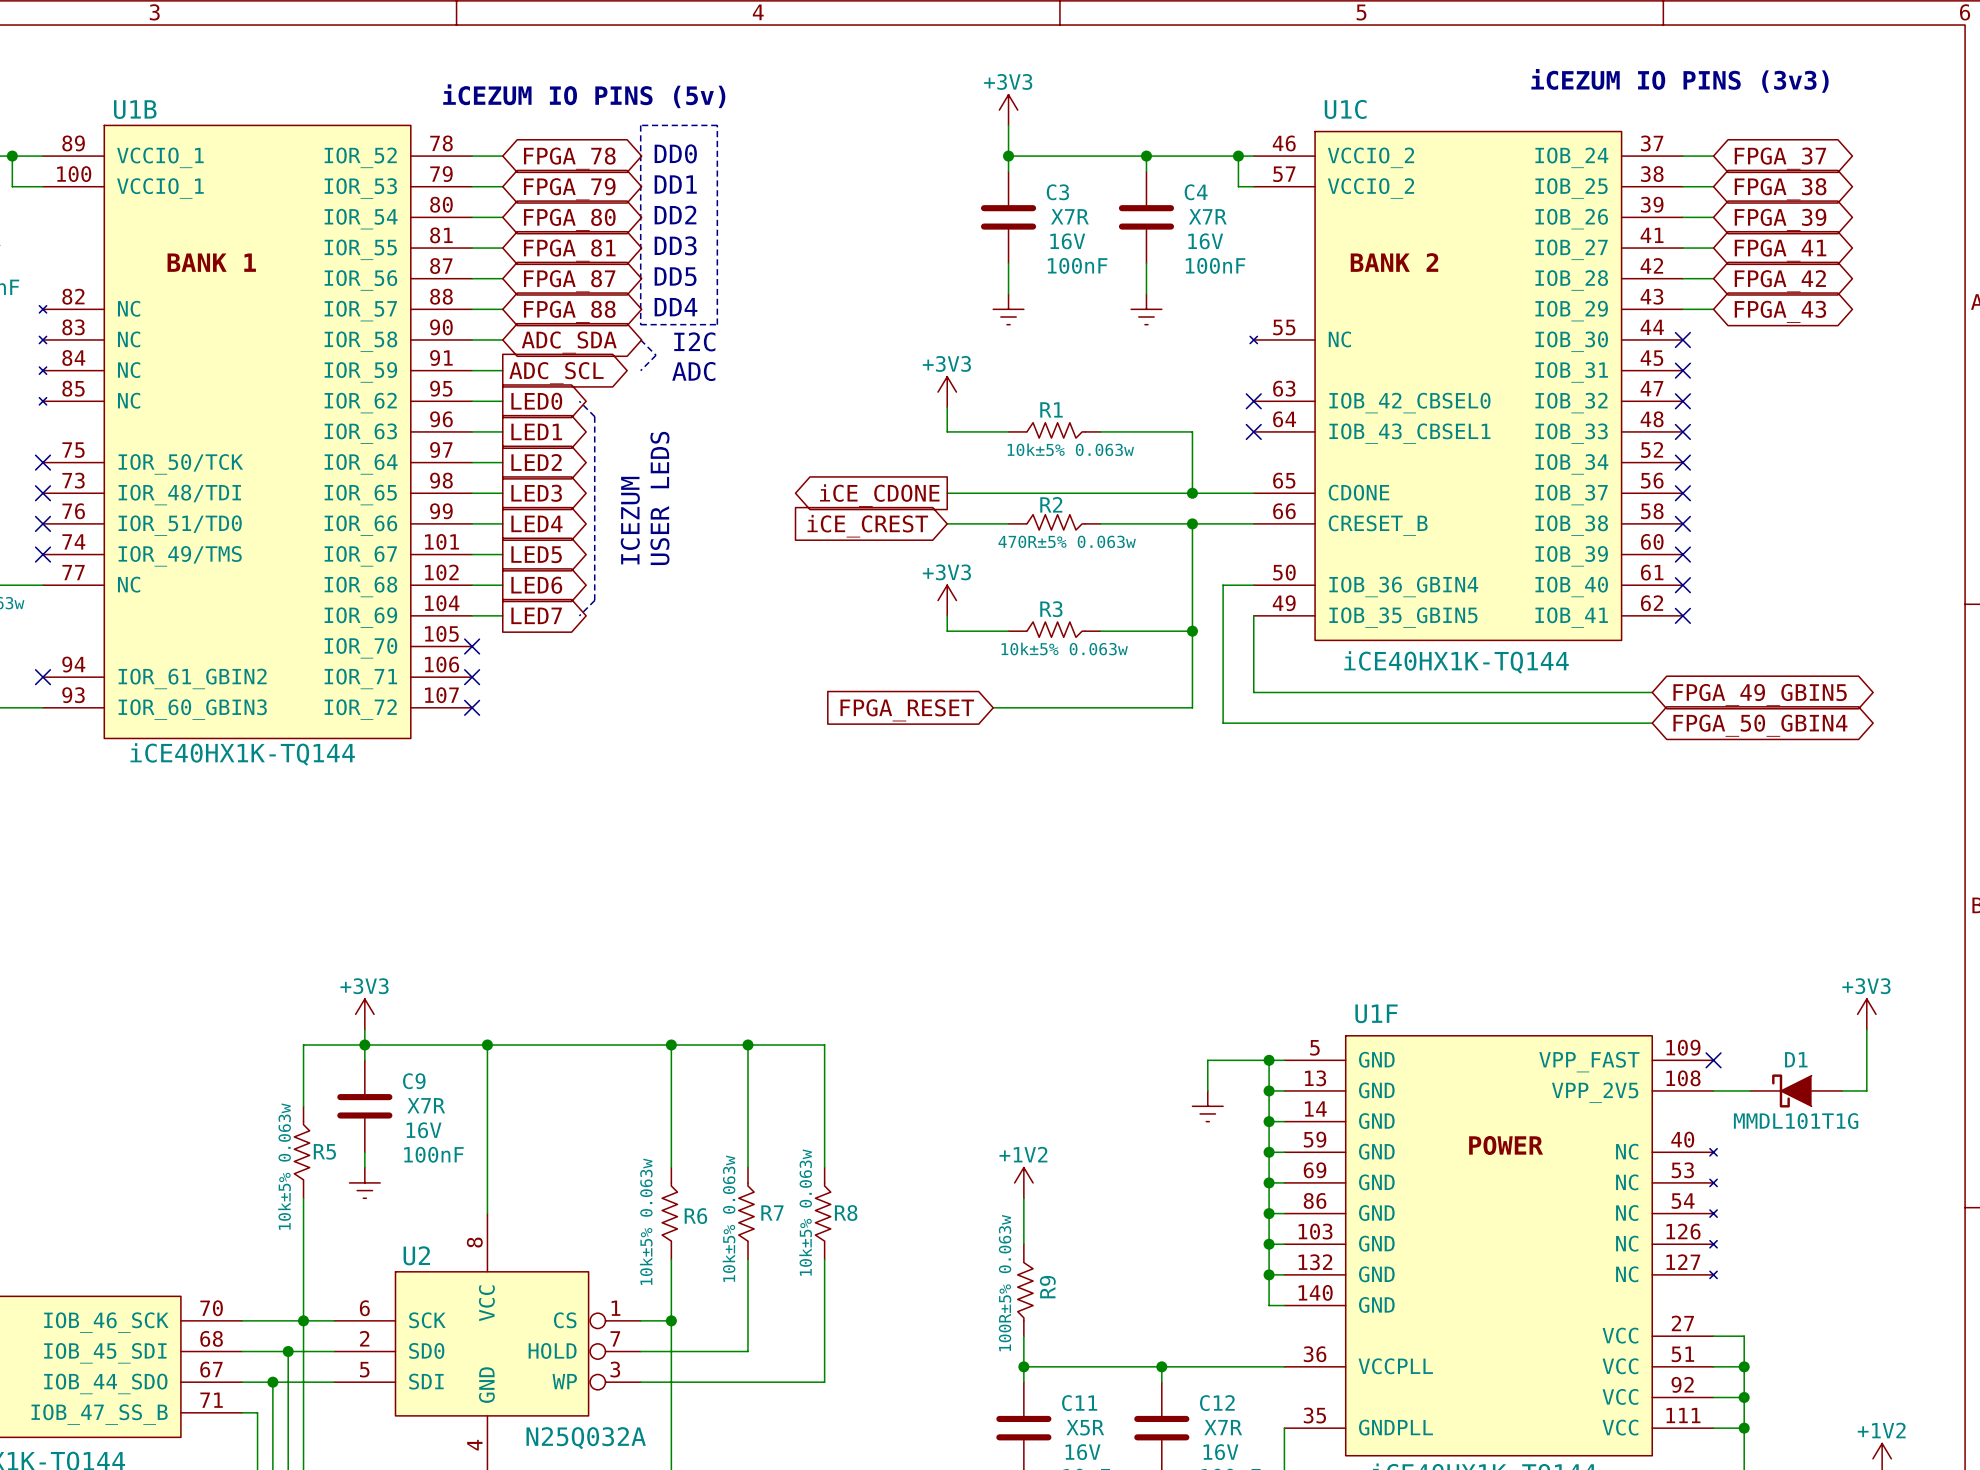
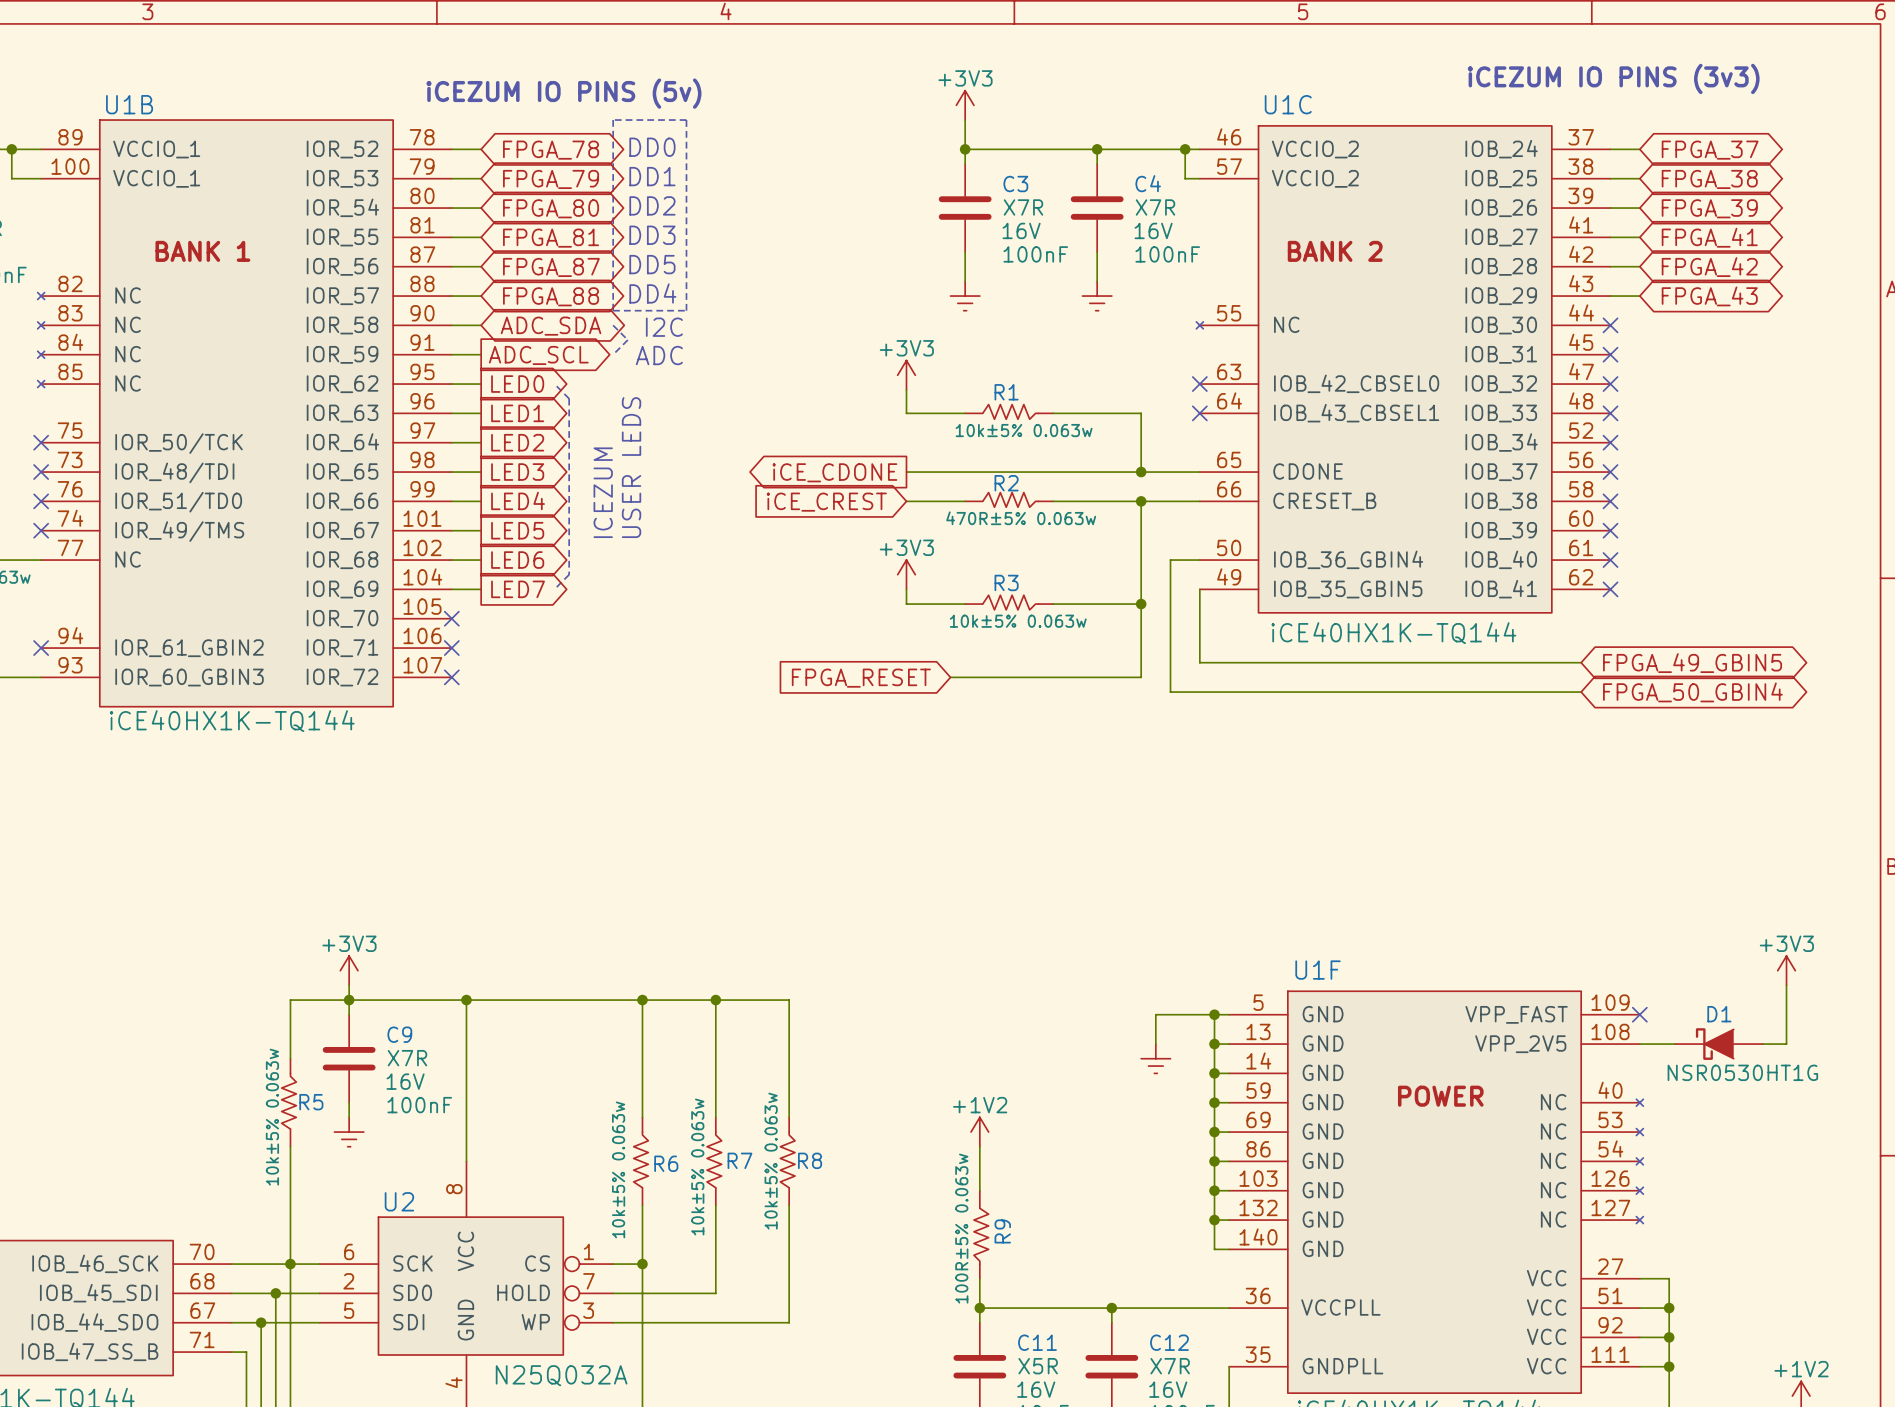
D1 value: MMDL101T1G (1796, 1121) -> NSR0530HT1G (1742, 1072)

